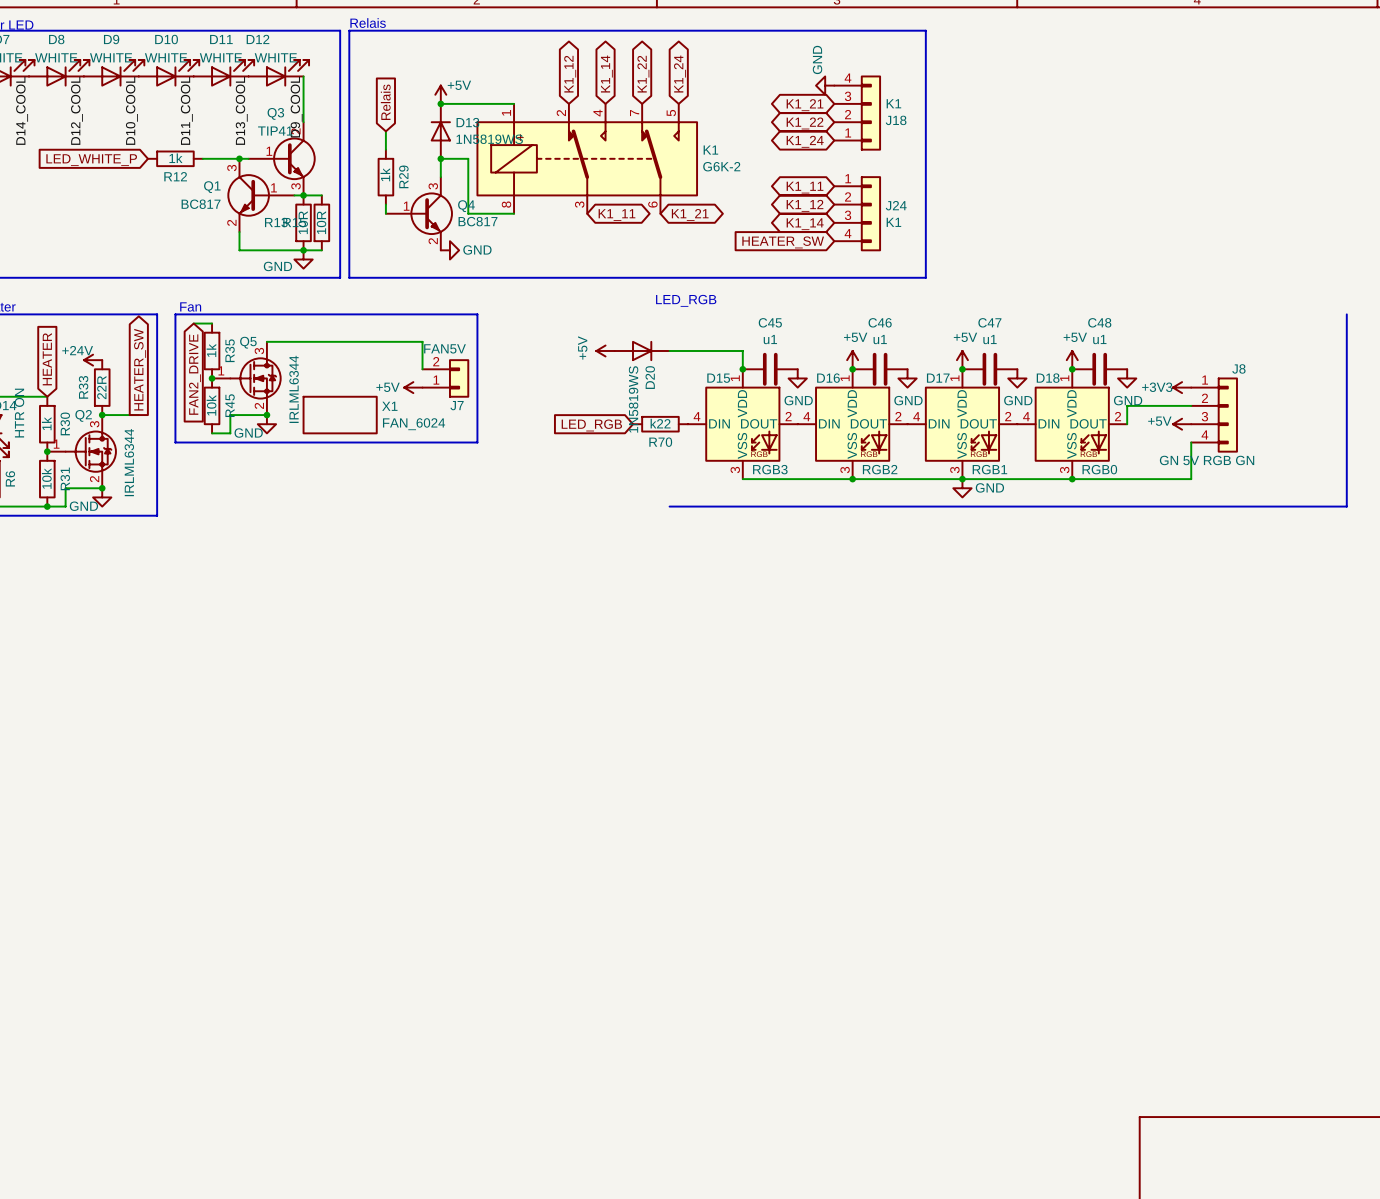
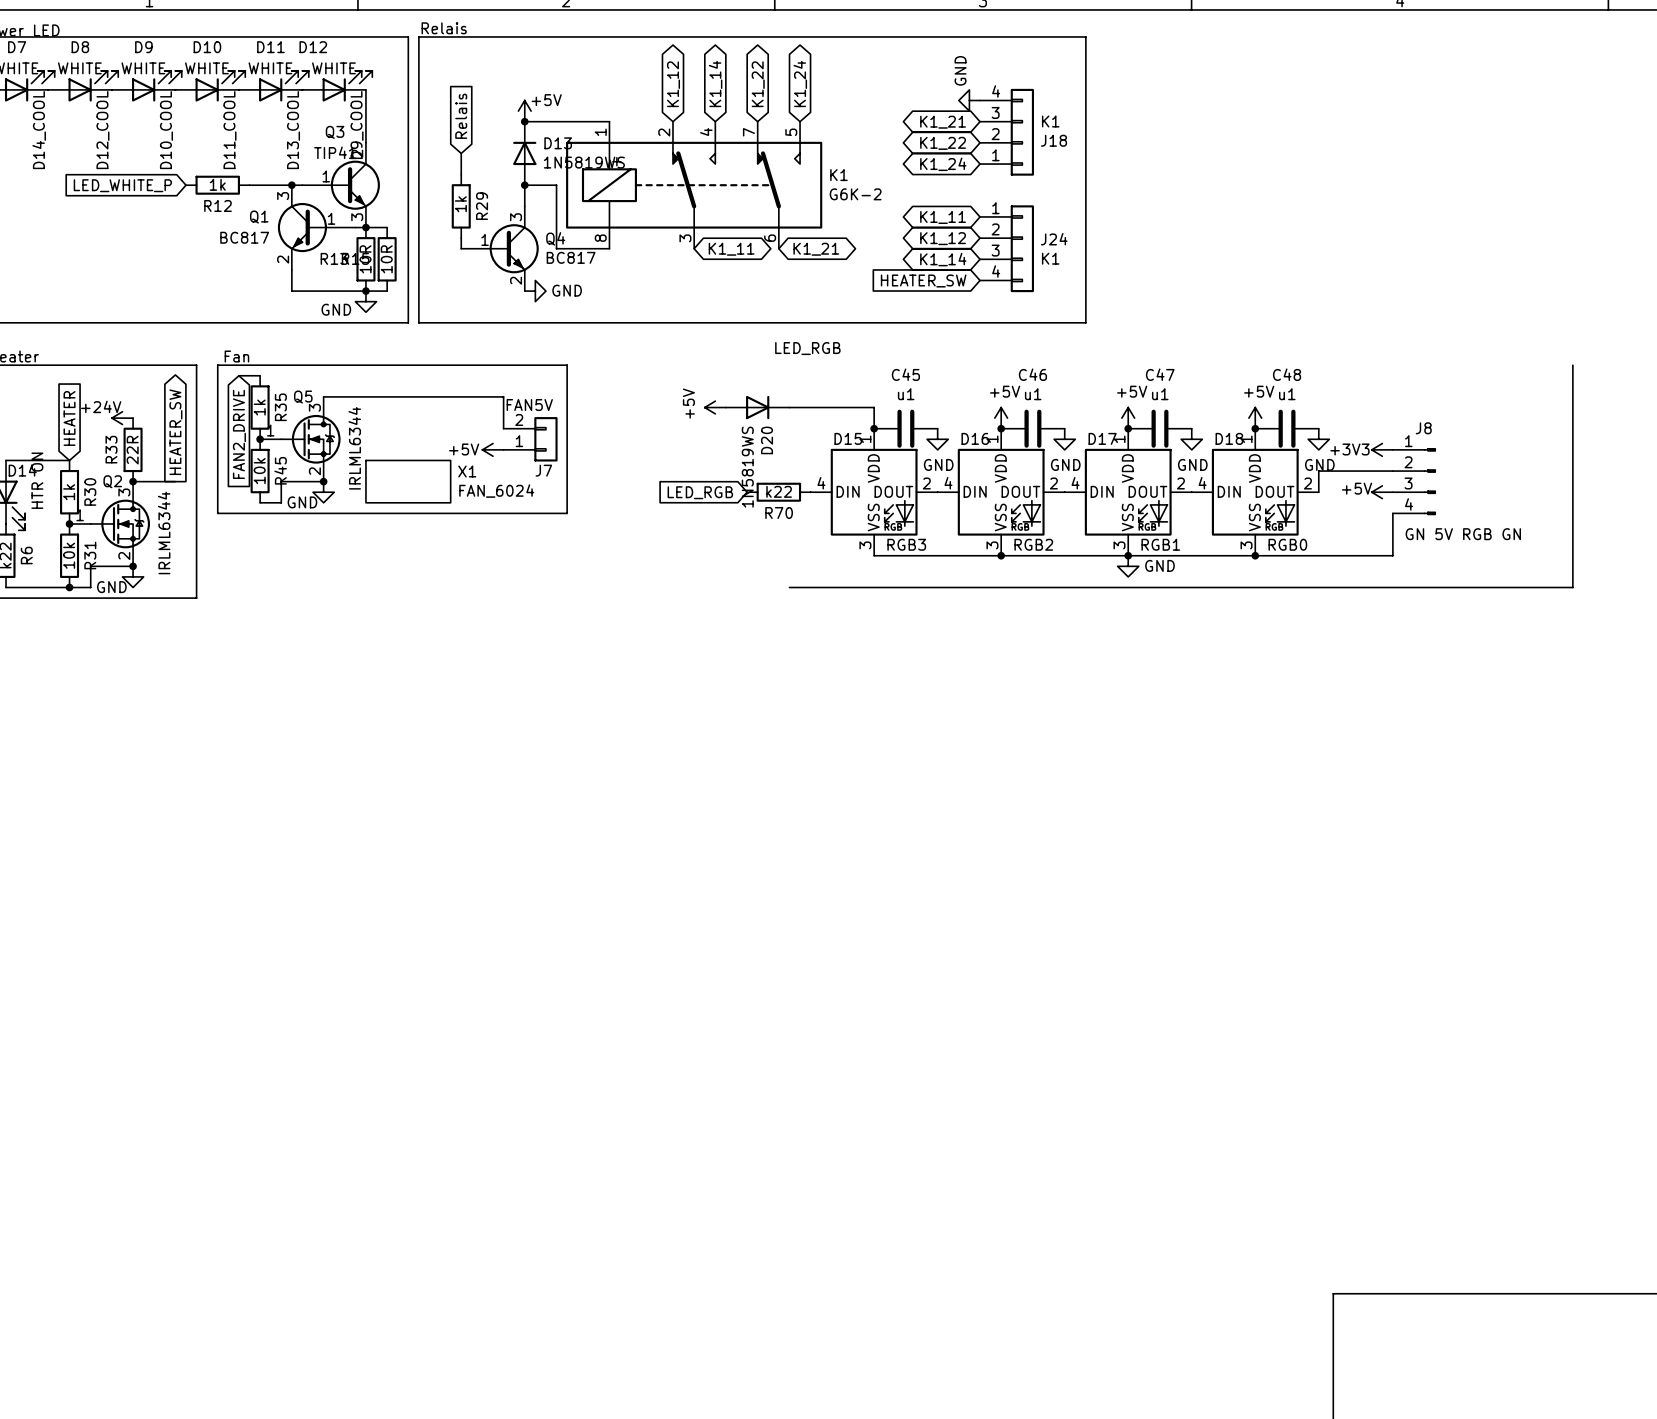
J8 symbol: [1191, 377, 1238, 453] -> [1392, 448, 1436, 516]
J8 value position: GN 5V RGB GN (1207, 460) -> GN 5V RGB GN (1463, 534)

